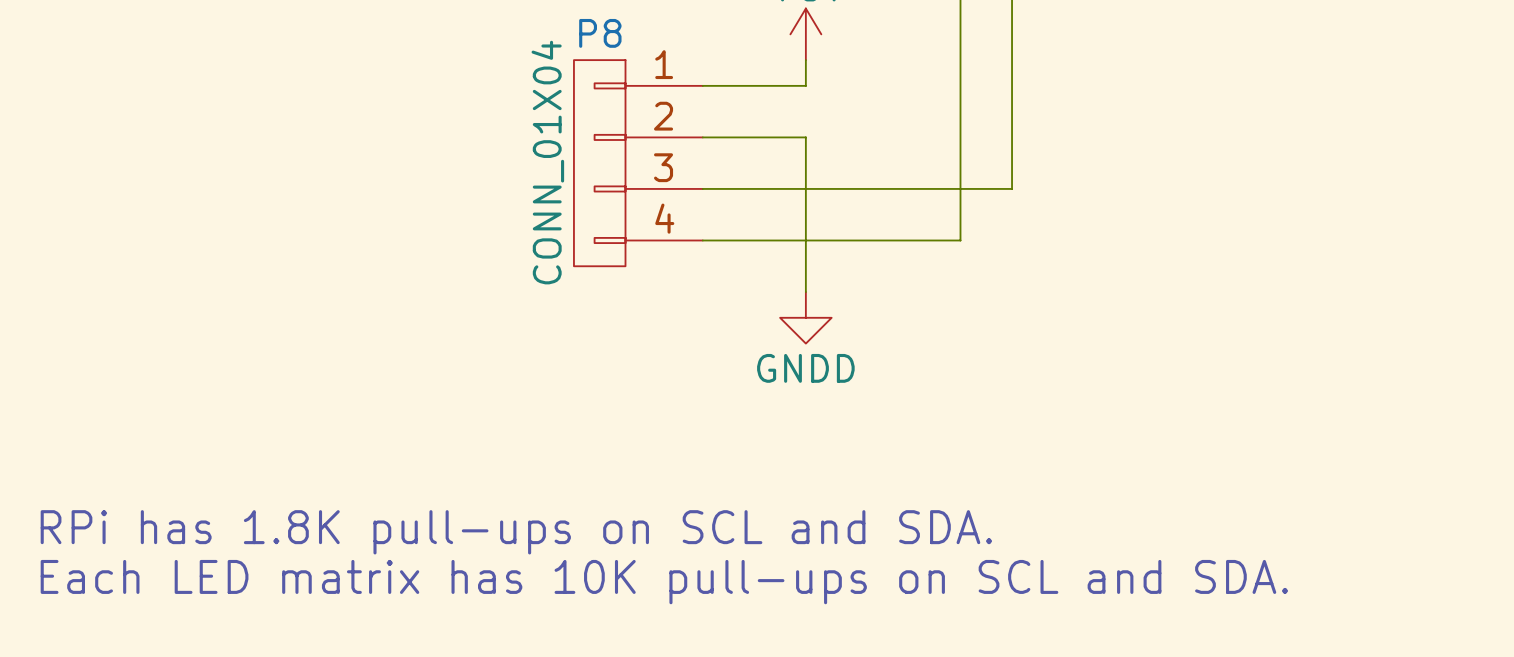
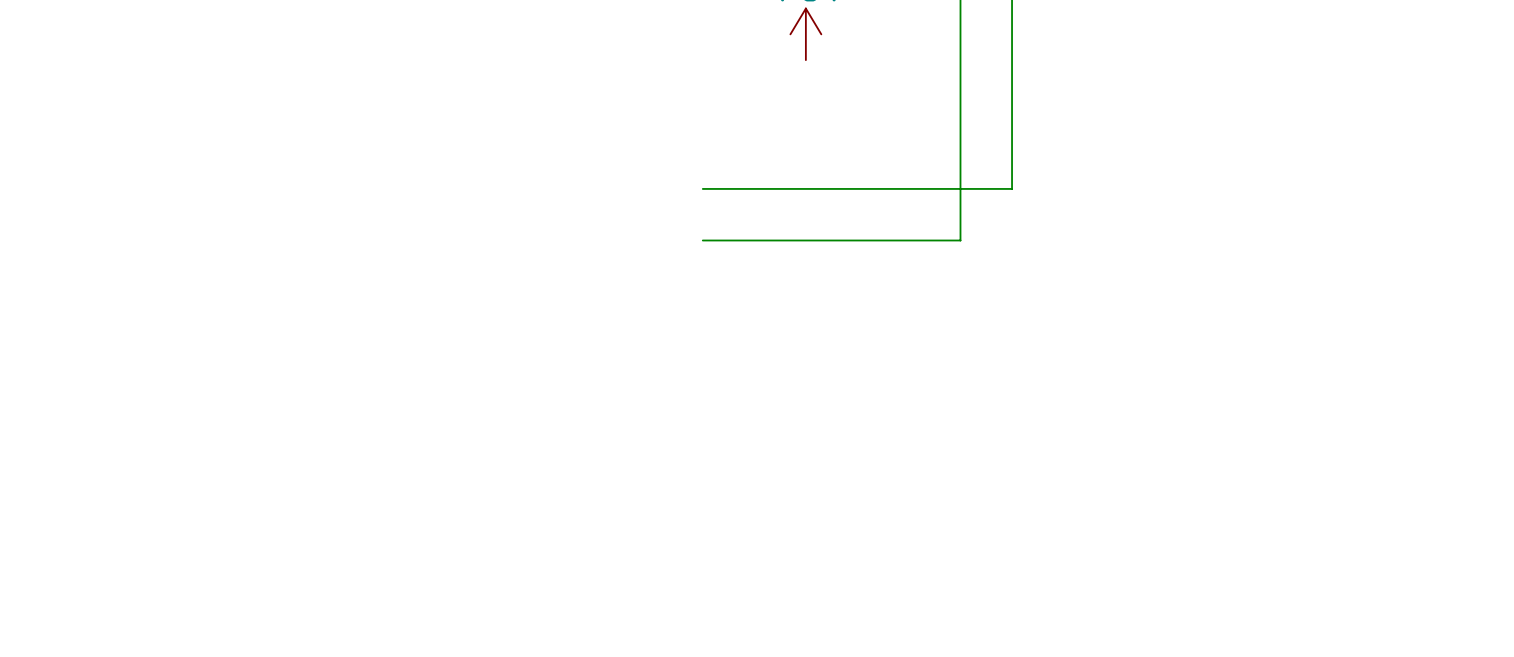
wire: (805, 60) (805, 85) (702, 85) -> none
wire: (702, 137) (805, 137) (805, 292) -> none
P8: CONN_01X04 (638, 163) -> none
power symbol: GNDD (805, 317) -> none
text: RPi has 1.8K pull-ups on SCL and SDA. (516, 532) -> none
text: Each LED matrix has 10K pull-ups on SCL and SDA. (664, 582) -> none

